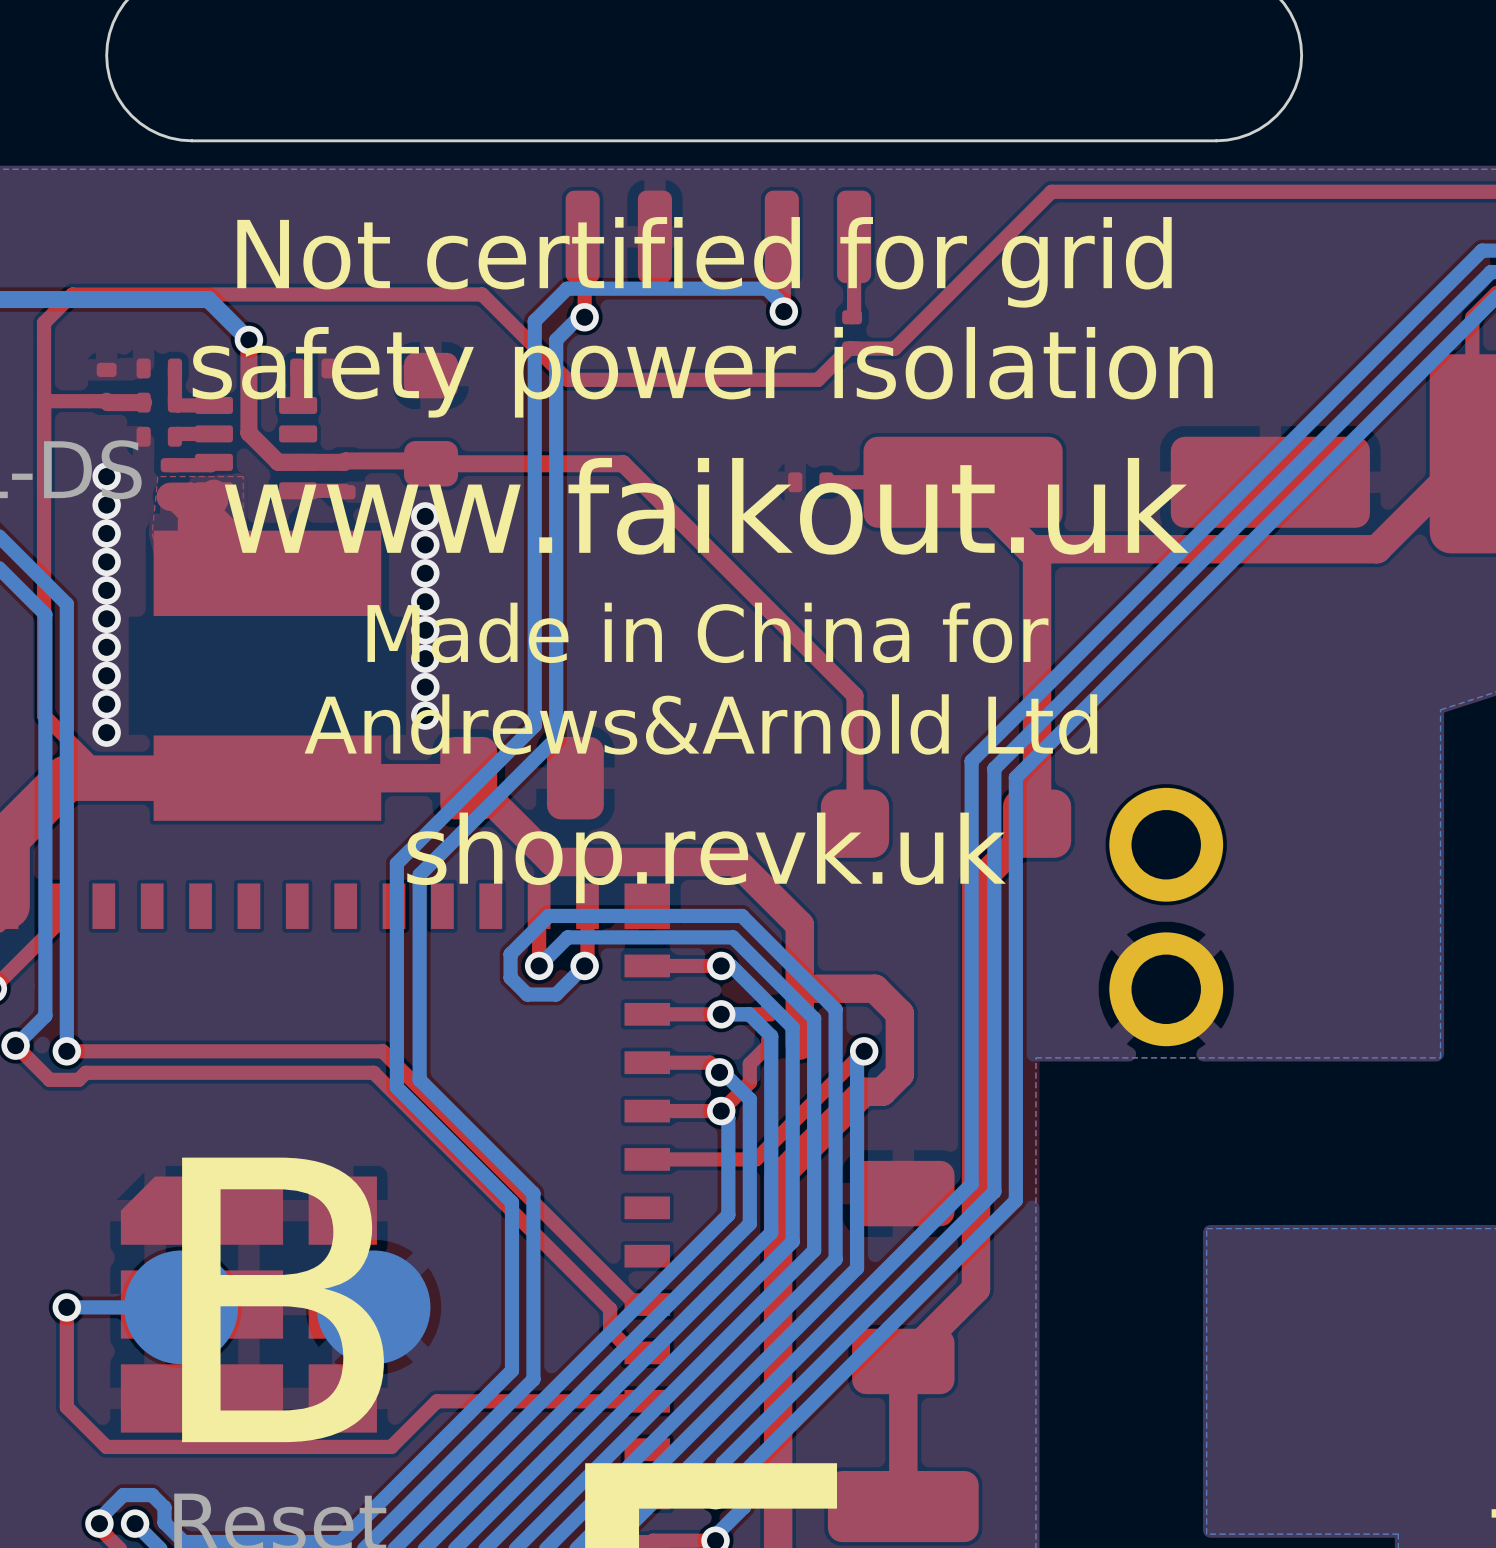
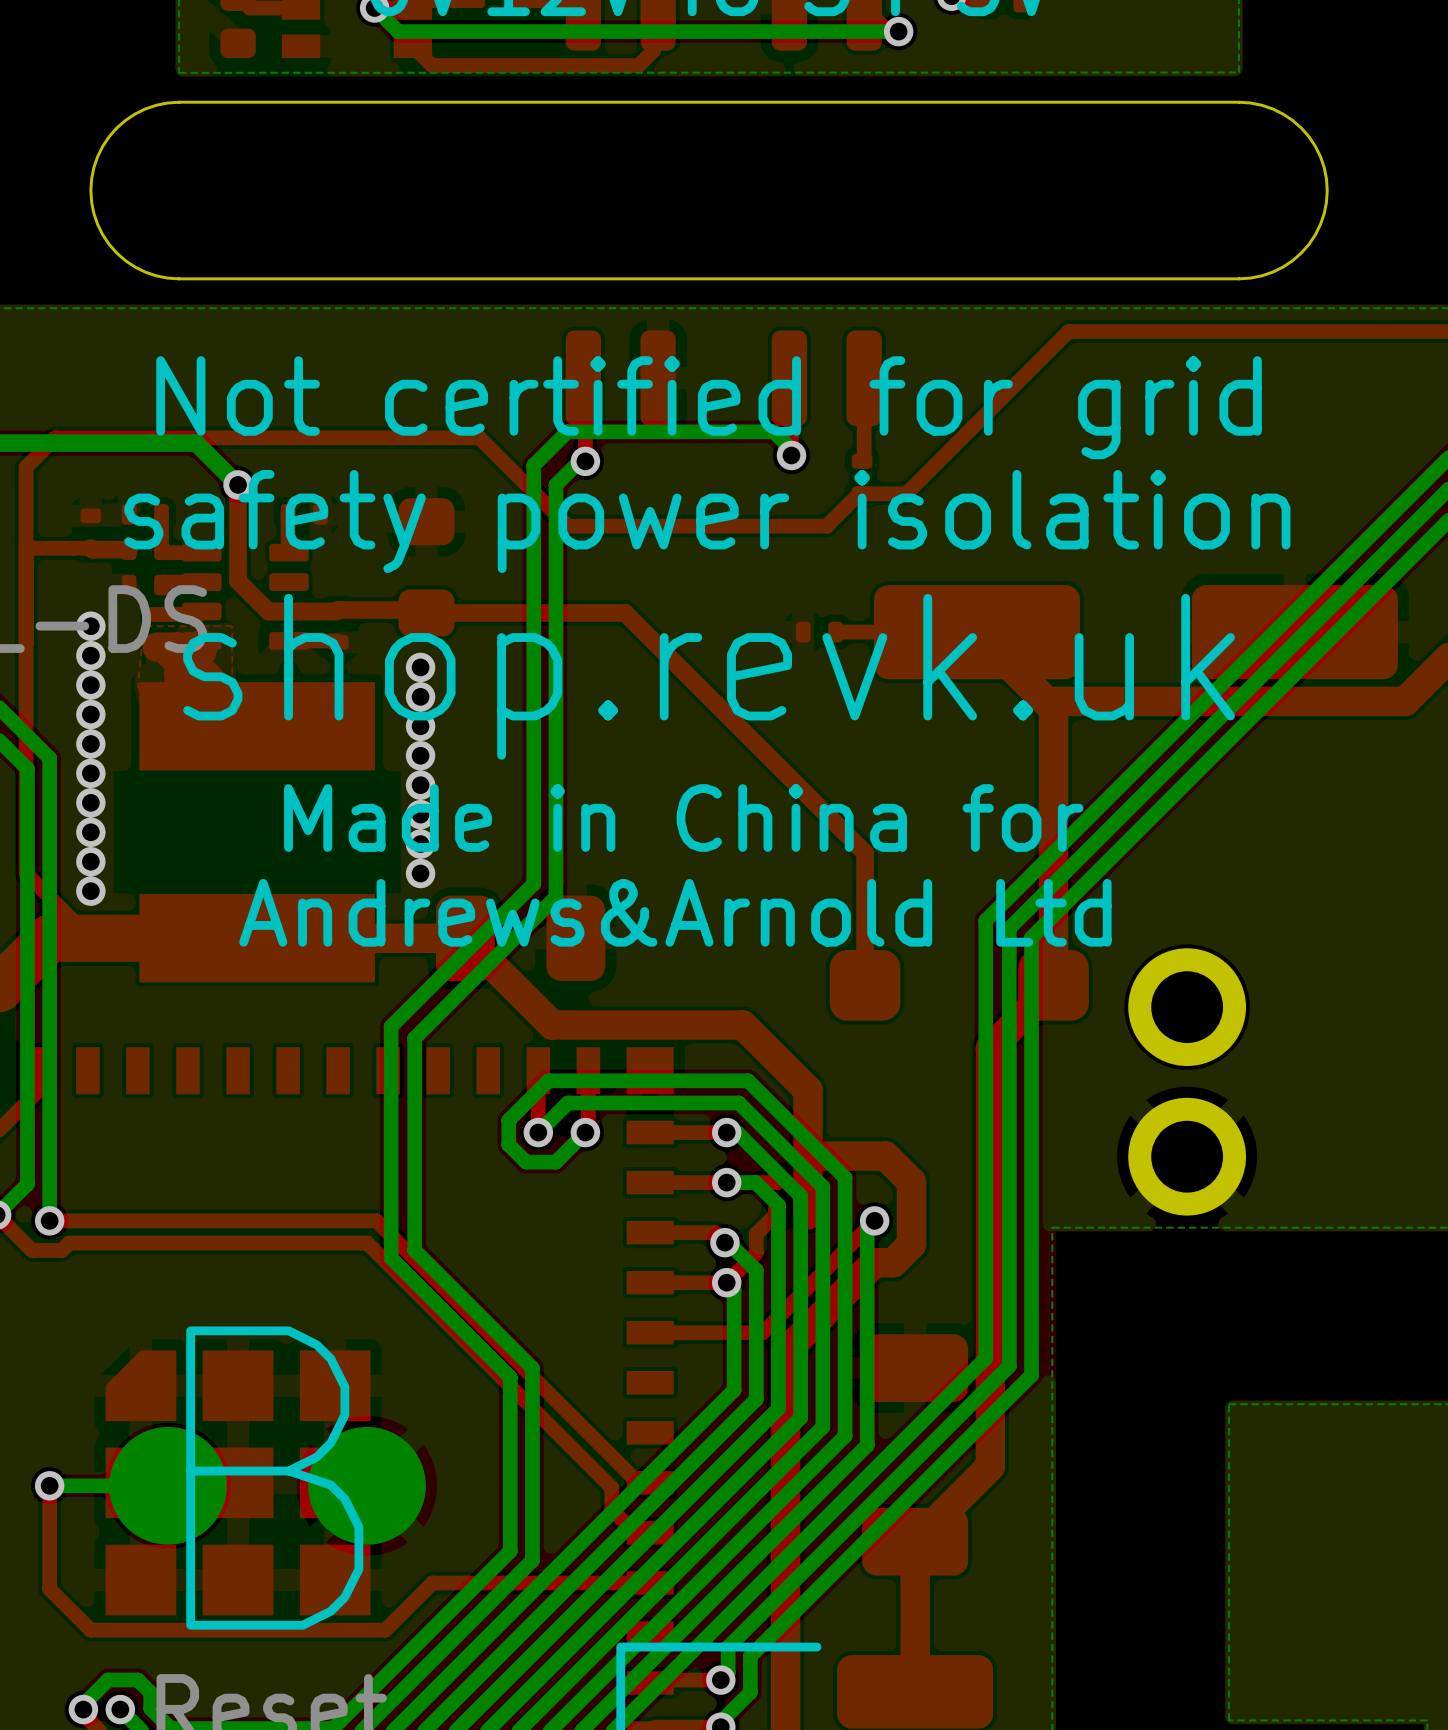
text: www.faikout.uk (706, 506) -> shop.revk.uk (709, 676)
text position: Made in China for (707, 632) -> Made in China for (683, 818)
text position: Andrews&Arnold Ltd (700, 724) -> Andrews&Arnold Ltd (675, 912)
text: shop.revk.uk (706, 857) -> none

